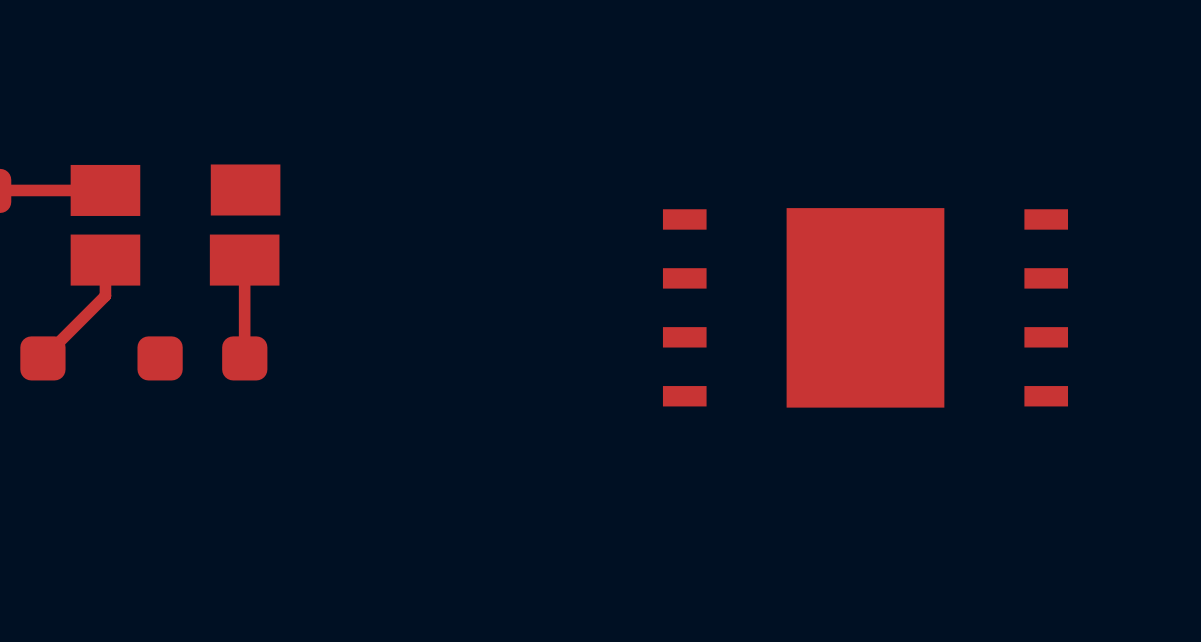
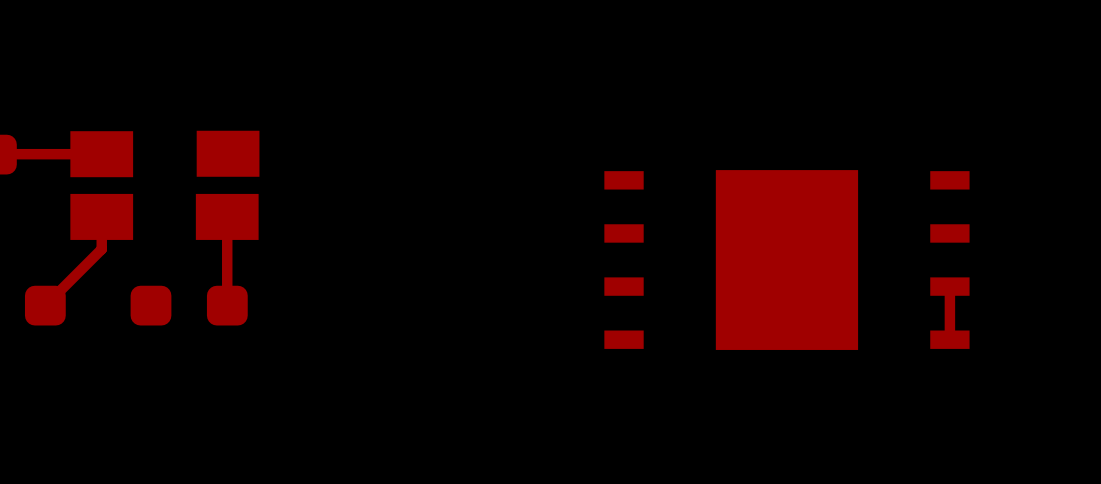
top track: none -> (949, 286) (949, 339)

